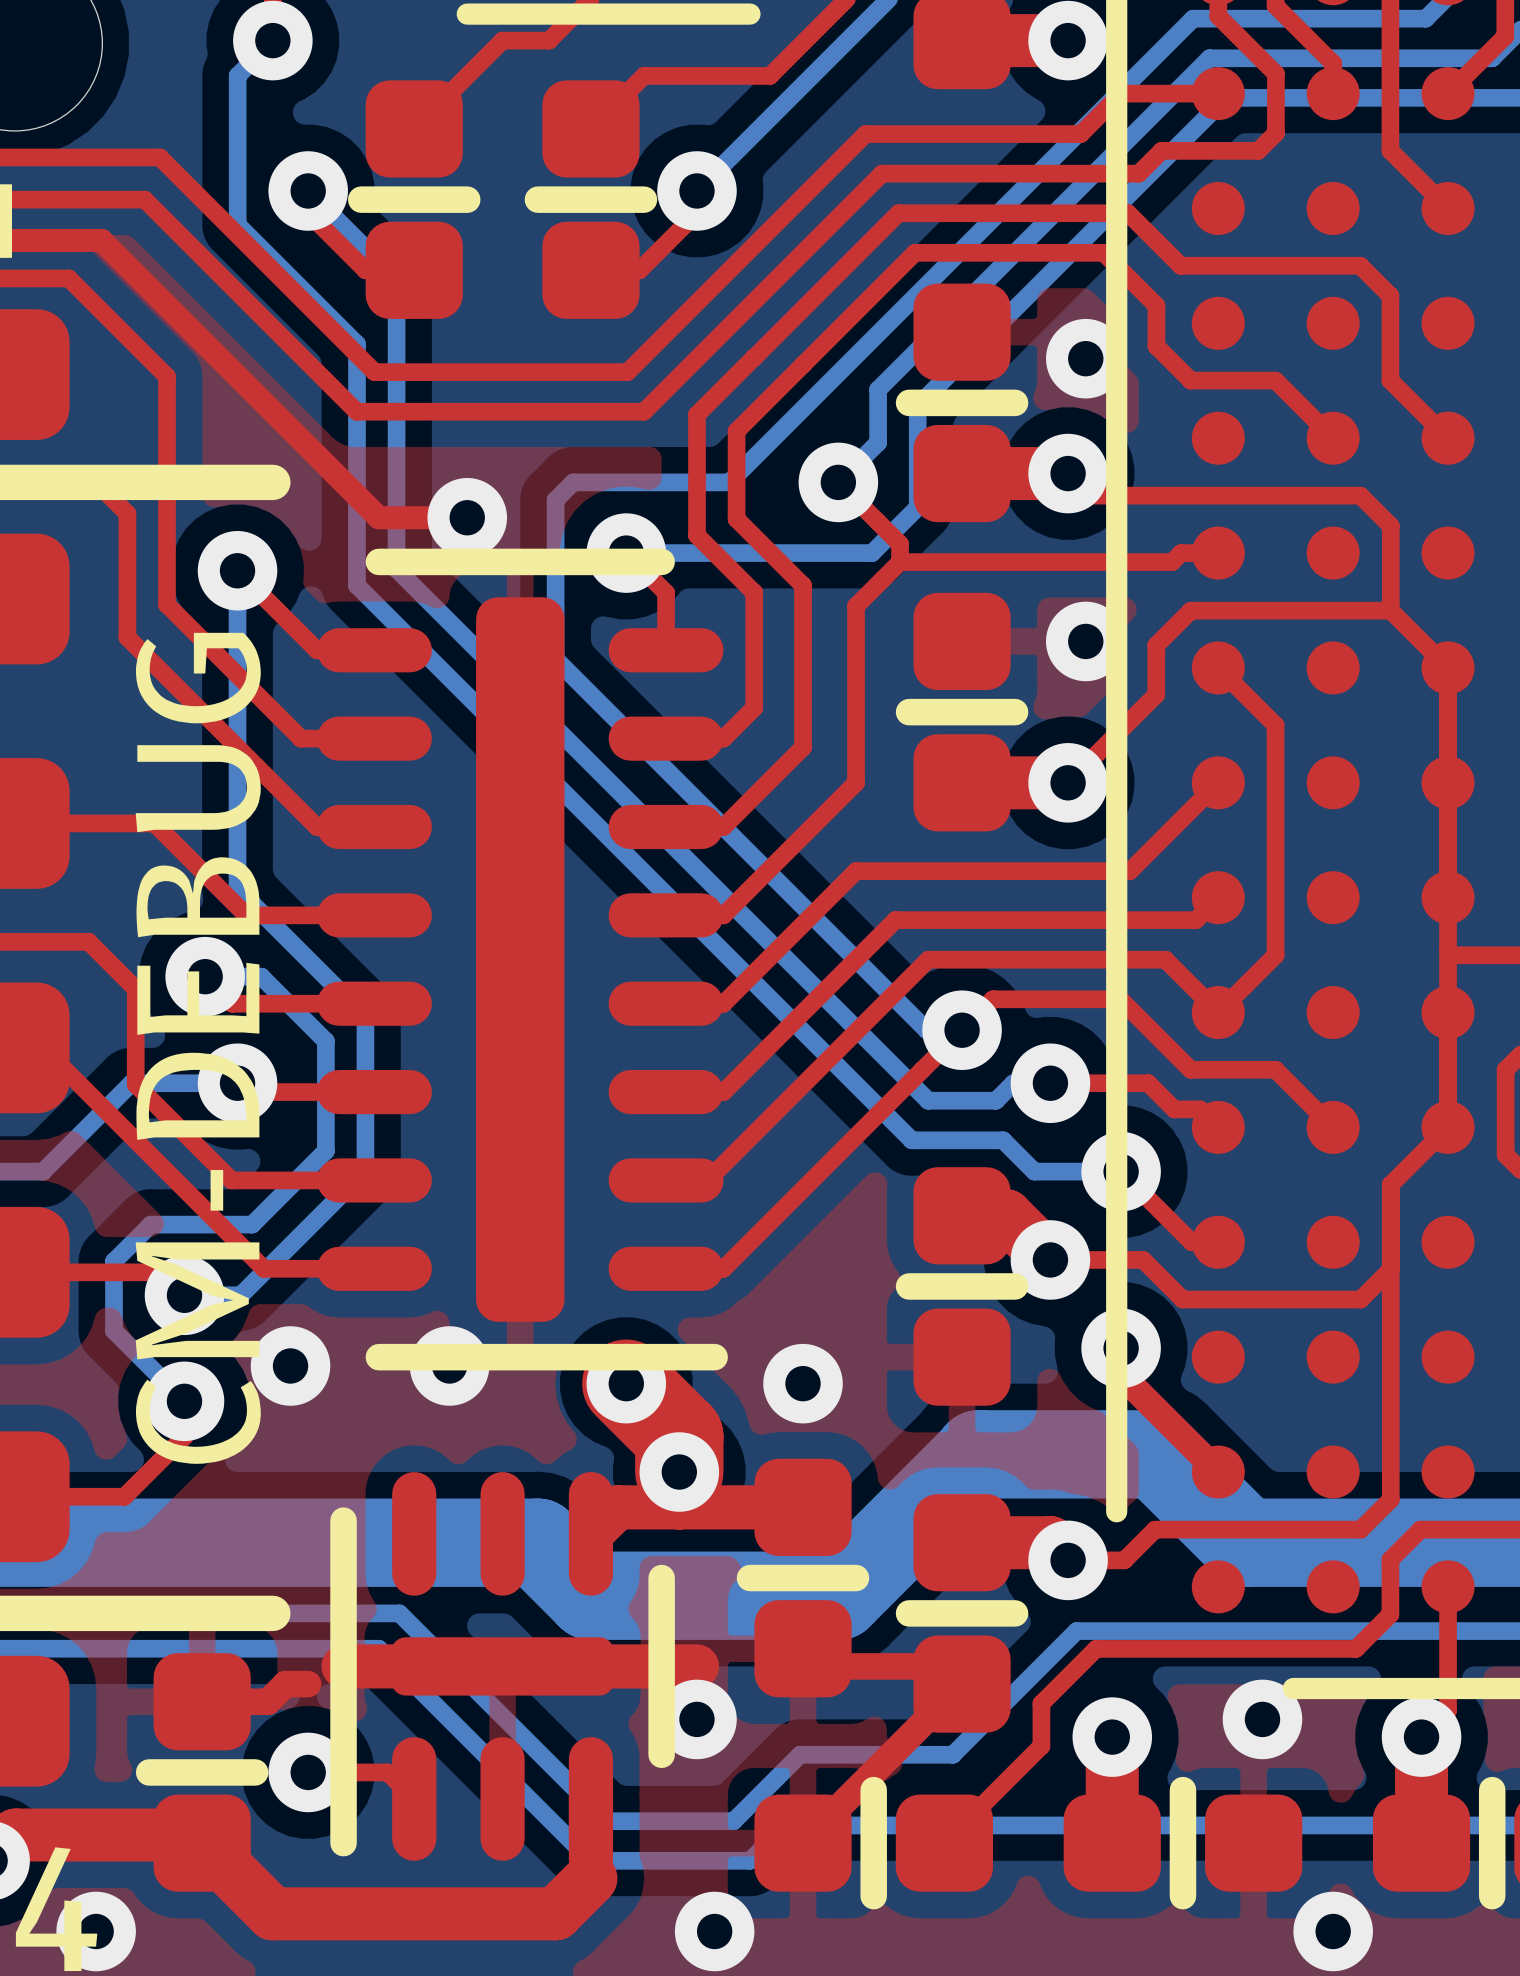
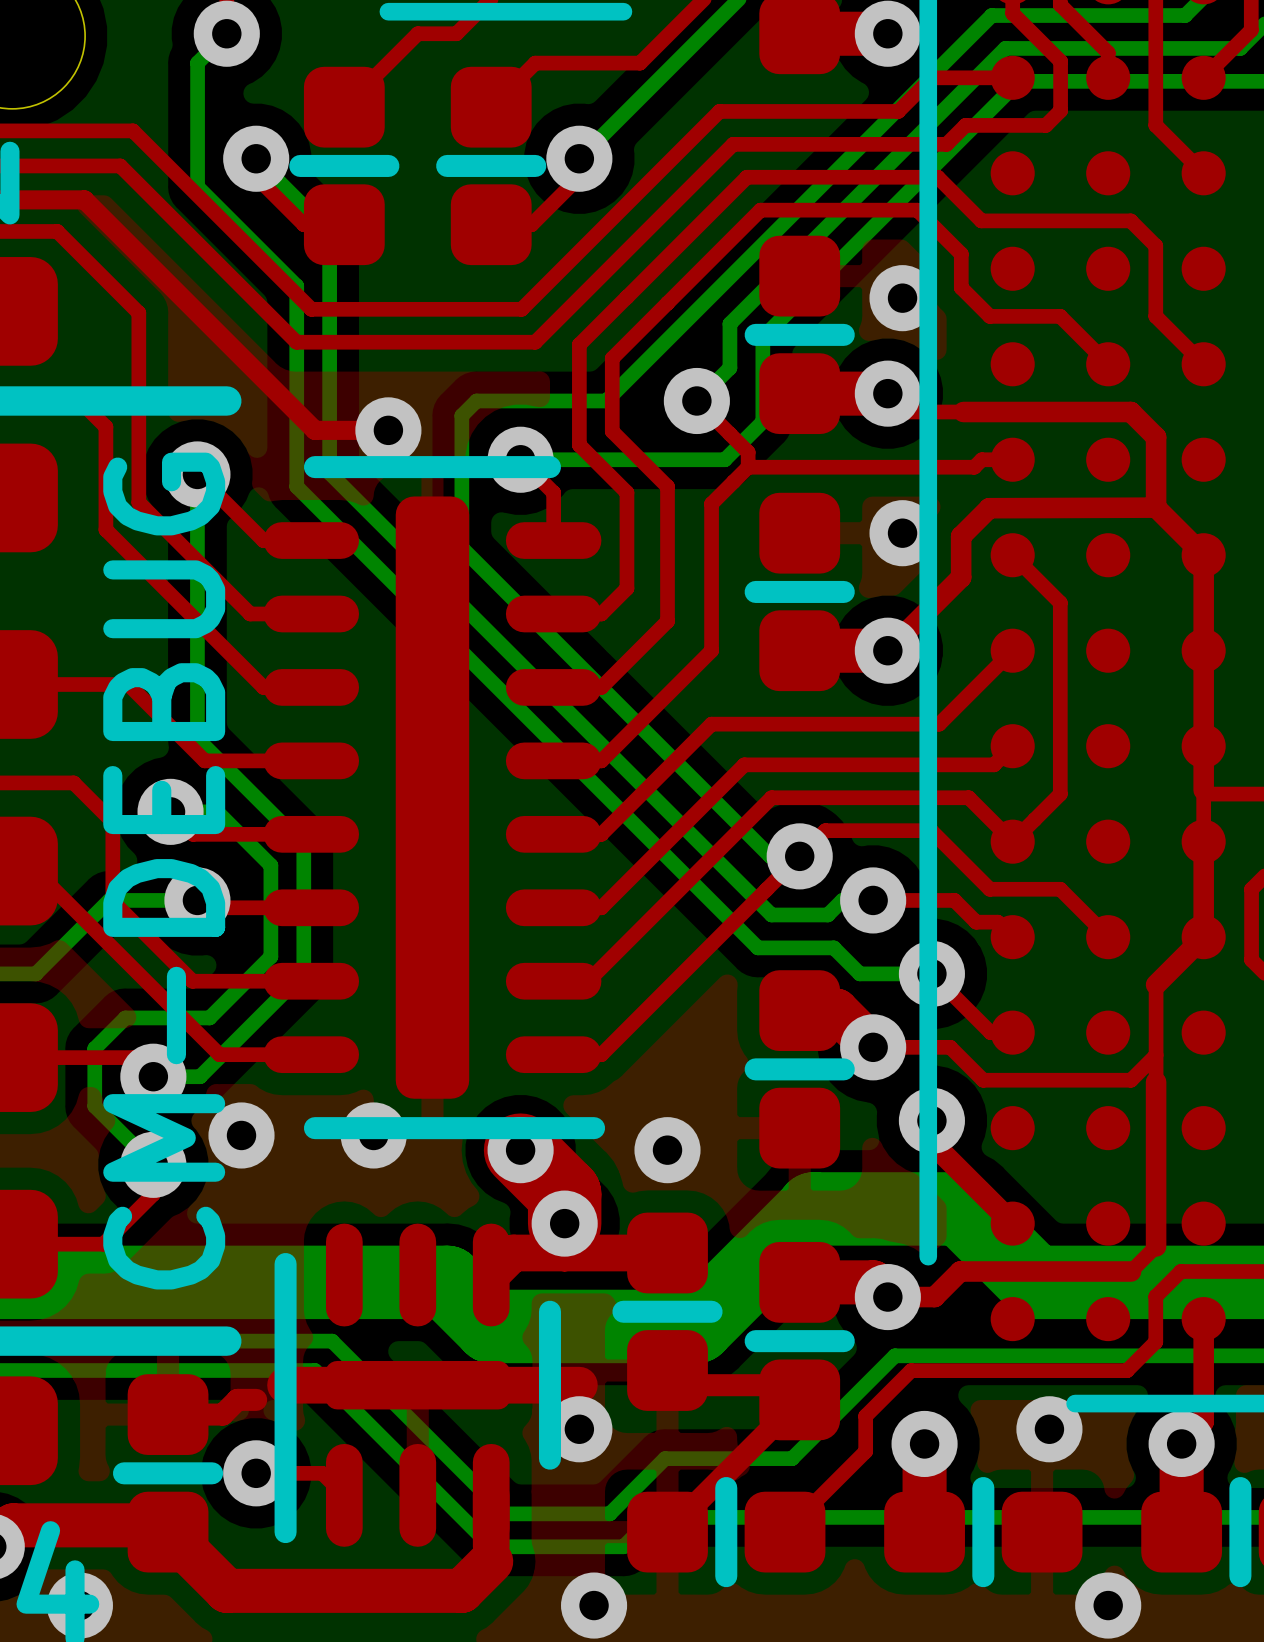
top track width: thin (1159, 495) (1360, 495) (1390, 525) (1390, 610) (1448, 667) (1448, 950) -> thick (963, 412) (1130, 412) (1156, 437) (1156, 507) (1203, 555) (1203, 790)
top track width: thin (1190, 610) (1156, 645) (1156, 694) (1068, 782) -> thick (989, 507) (961, 536) (961, 577) (887, 650)
top track width: thin (1448, 1003) (1448, 1127) (1390, 1184) -> thick (1203, 834) (1203, 937) (1156, 984)
top track width: thin (1390, 1301) (1390, 1499) -> thick (1156, 1082) (1156, 1246)
top track width: thin (1360, 1529) (1155, 1529) (1124, 1560) (1068, 1560) -> thick (1131, 1271) (960, 1271) (934, 1297) (887, 1297)
top track width: thin (1448, 1586) (1448, 1710) (1421, 1737) -> thick (1203, 1319) (1203, 1421) (1181, 1443)

